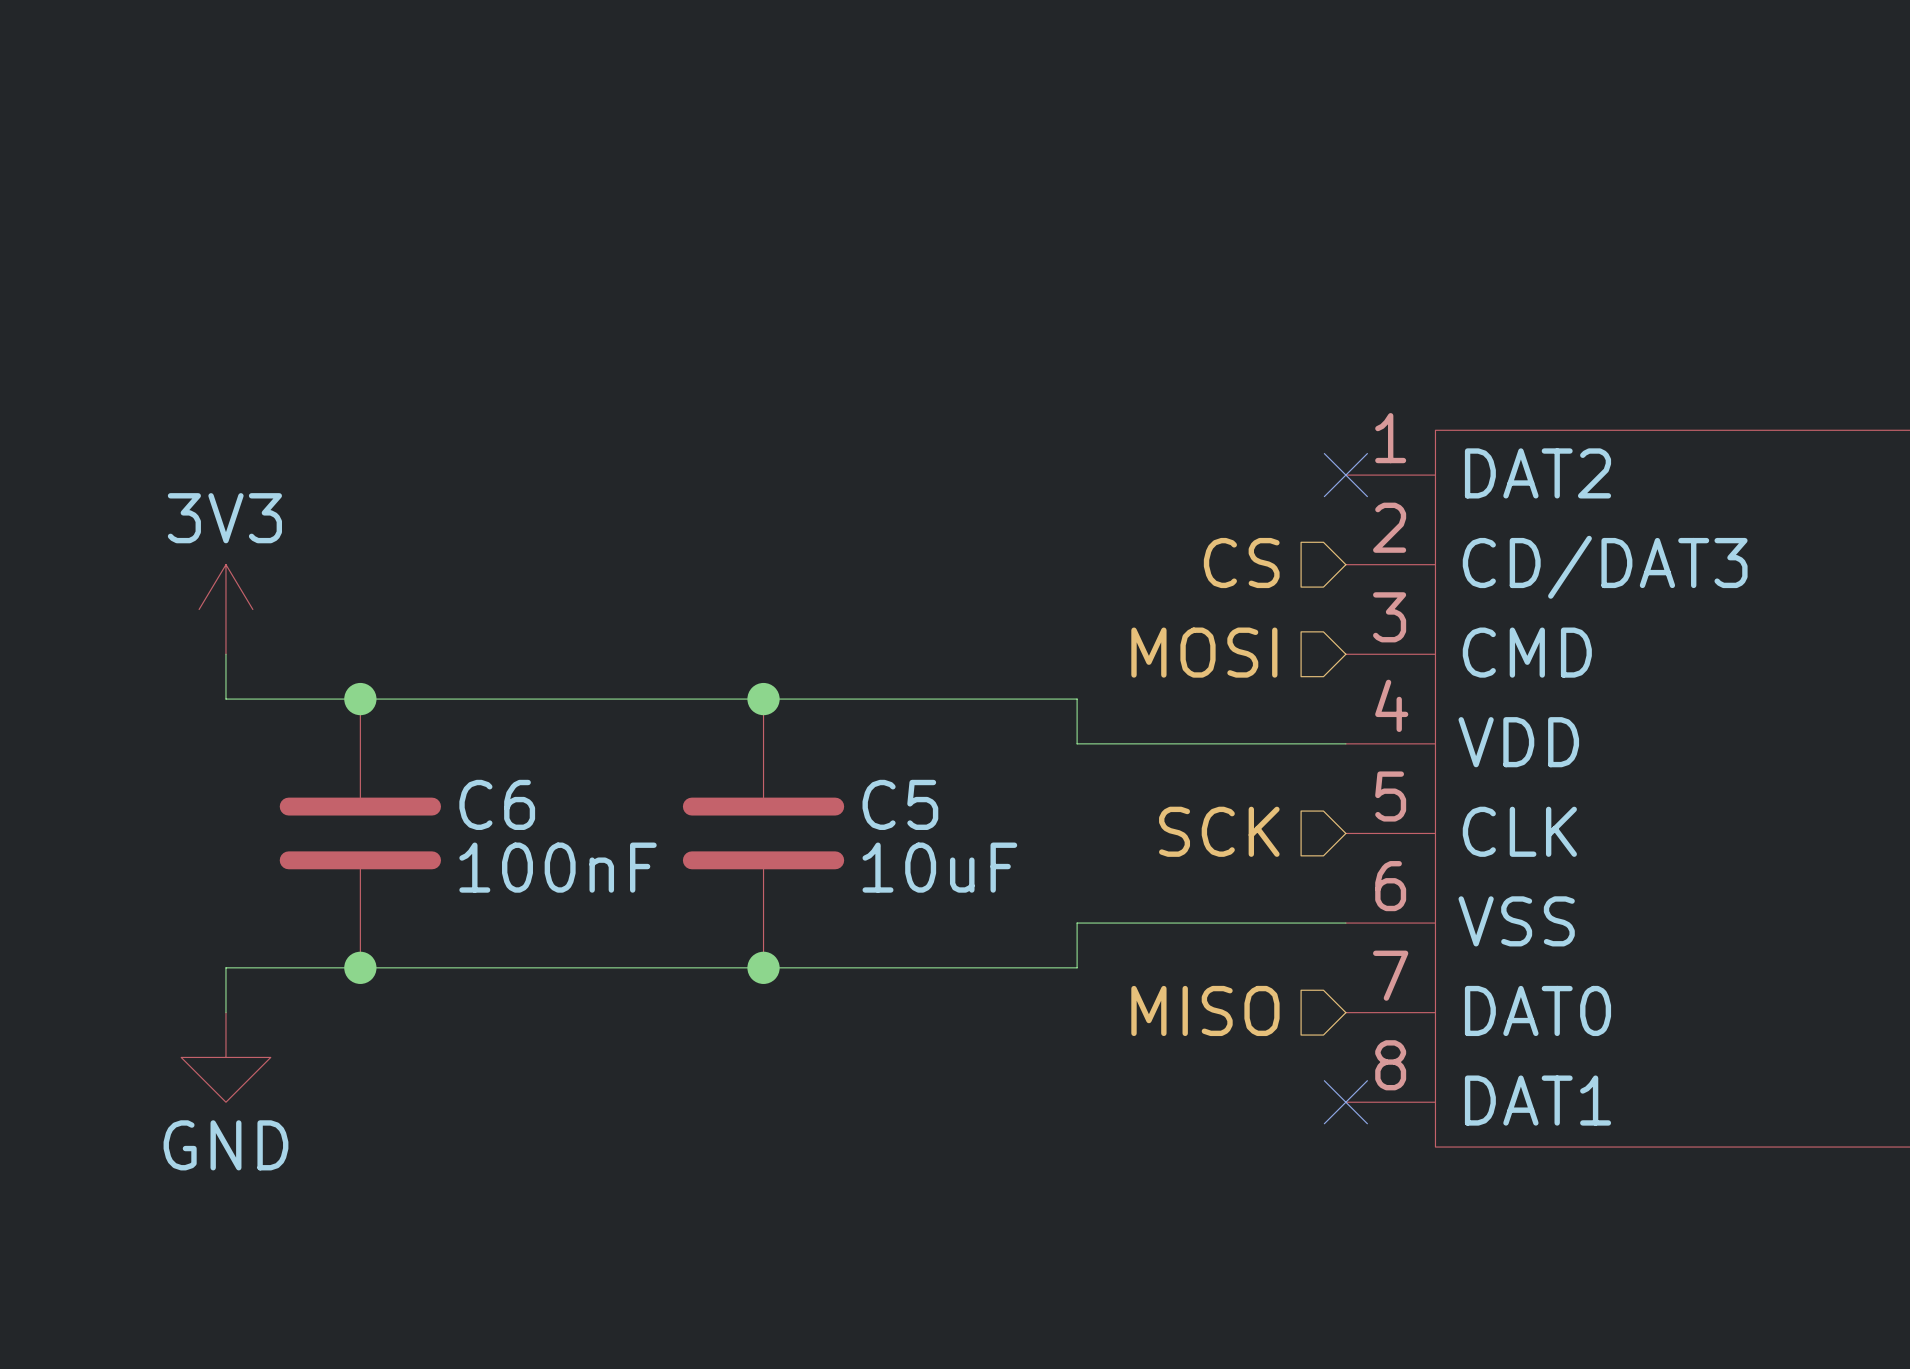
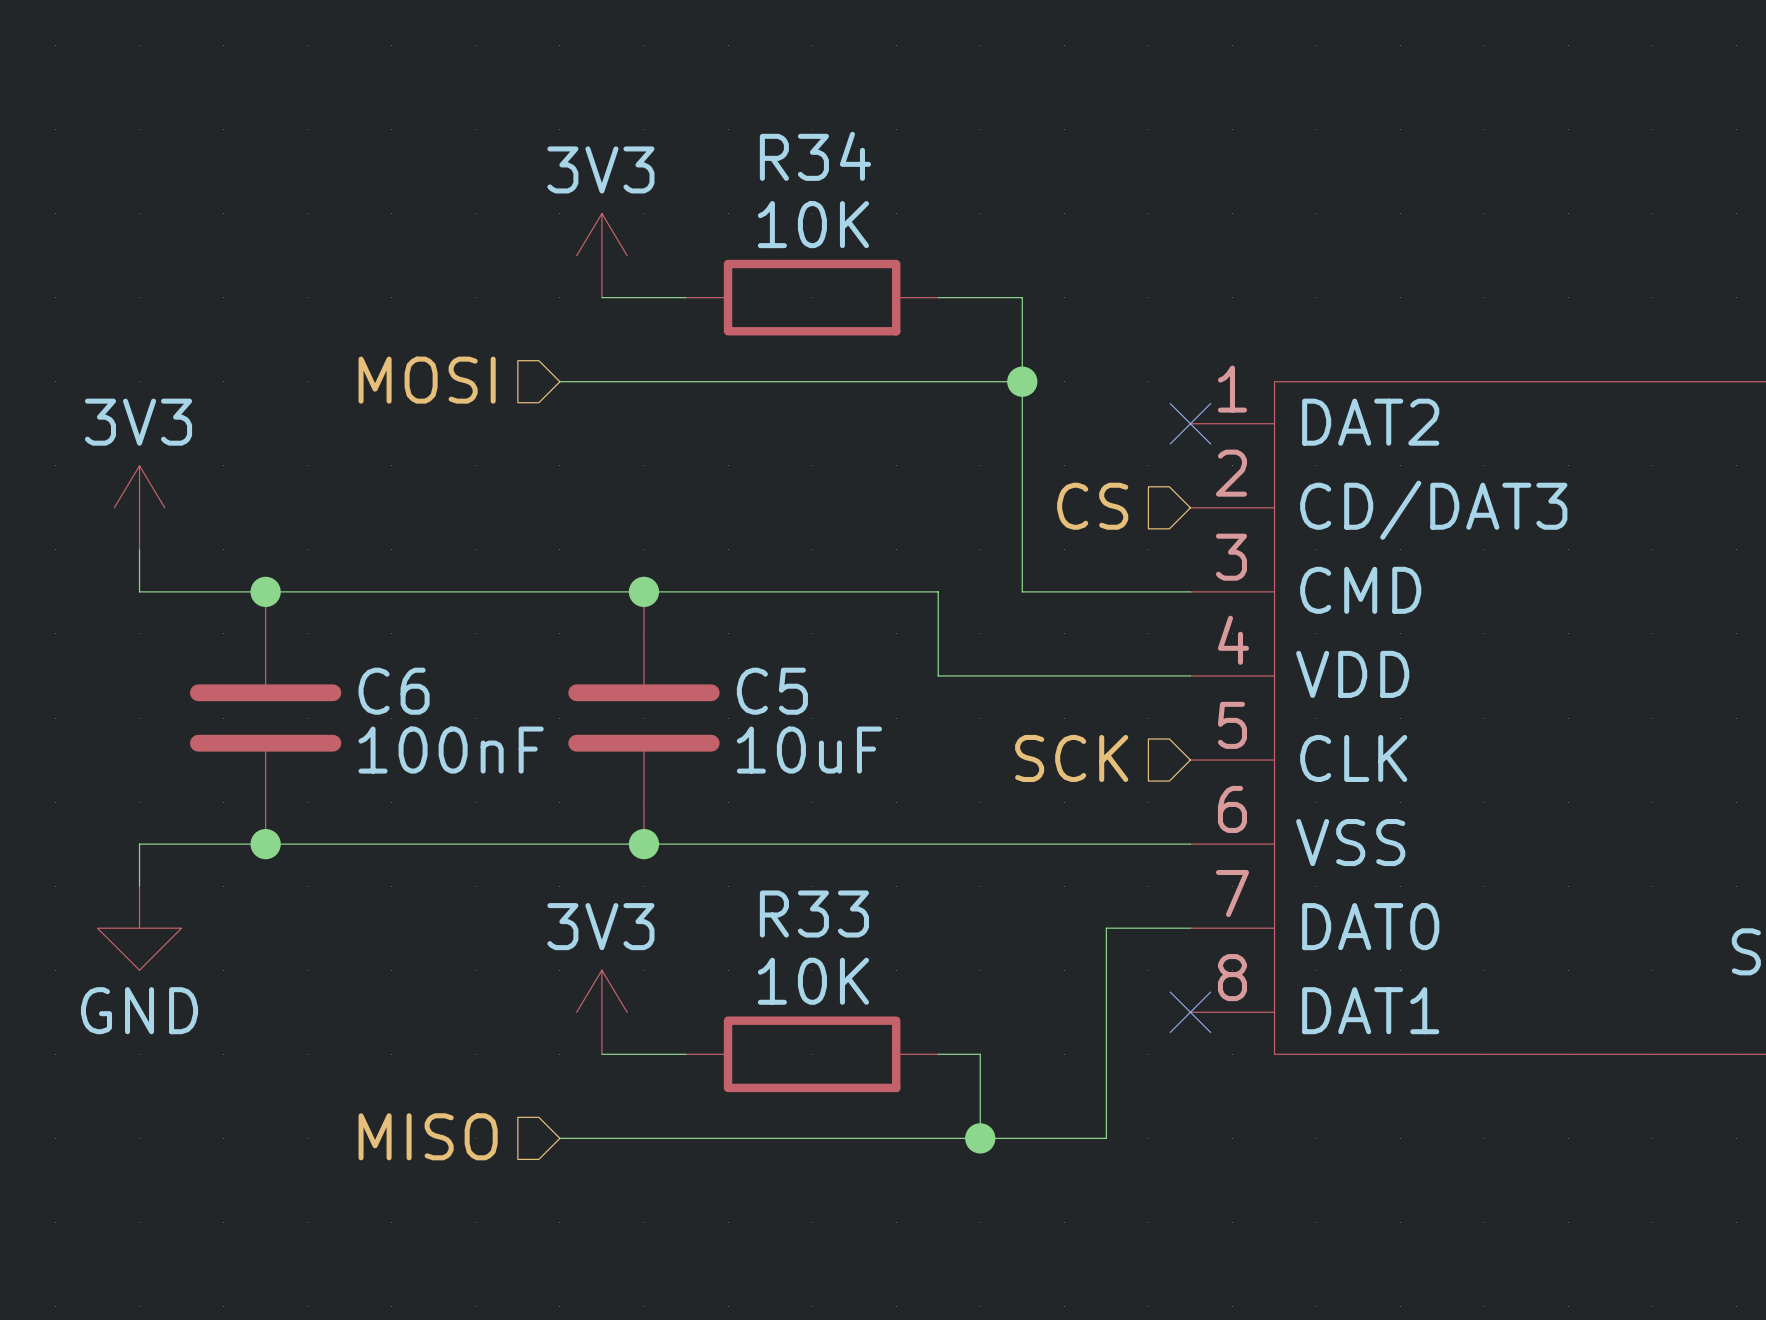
power symbol: none -> 3V3 (601, 255)
wire: none -> (601, 297) (686, 297)
R34: none -> 10K (812, 297)
wire: none -> (938, 297) (1022, 297) (1022, 591) (1190, 591)
wire: none -> (559, 381) (1022, 381)
junction: none -> (1022, 381)
power symbol position: 3V3 (225, 609) -> 3V3 (139, 507)
hierarchical label position: MOSI (1204, 652) -> MOSI (427, 380)
wire: (225, 654) (225, 699) (1077, 699) -> (139, 549) (139, 591) (938, 591) (938, 633)
junction position: (360, 699) -> (265, 591)
junction position: (763, 699) -> (643, 591)
C6 position: (360, 833) -> (265, 718)
C5 position: (763, 833) -> (643, 718)
wire: (1077, 923) (1077, 967) (225, 967) (225, 1012) -> (938, 844) (139, 844) (139, 886)
junction position: (360, 967) -> (265, 844)
junction position: (763, 967) -> (643, 844)
hierarchical label position: MISO (1205, 1010) -> MISO (428, 1136)
wire: none -> (1190, 928) (1106, 928) (1106, 1138) (559, 1138)
power symbol position: GND (225, 1057) -> GND (139, 928)
power symbol: none -> 3V3 (601, 1012)
wire: none -> (601, 1054) (686, 1054)
R33: none -> 10K (812, 1054)
wire: none -> (938, 1054) (980, 1054) (980, 1138)
junction: none -> (980, 1138)

